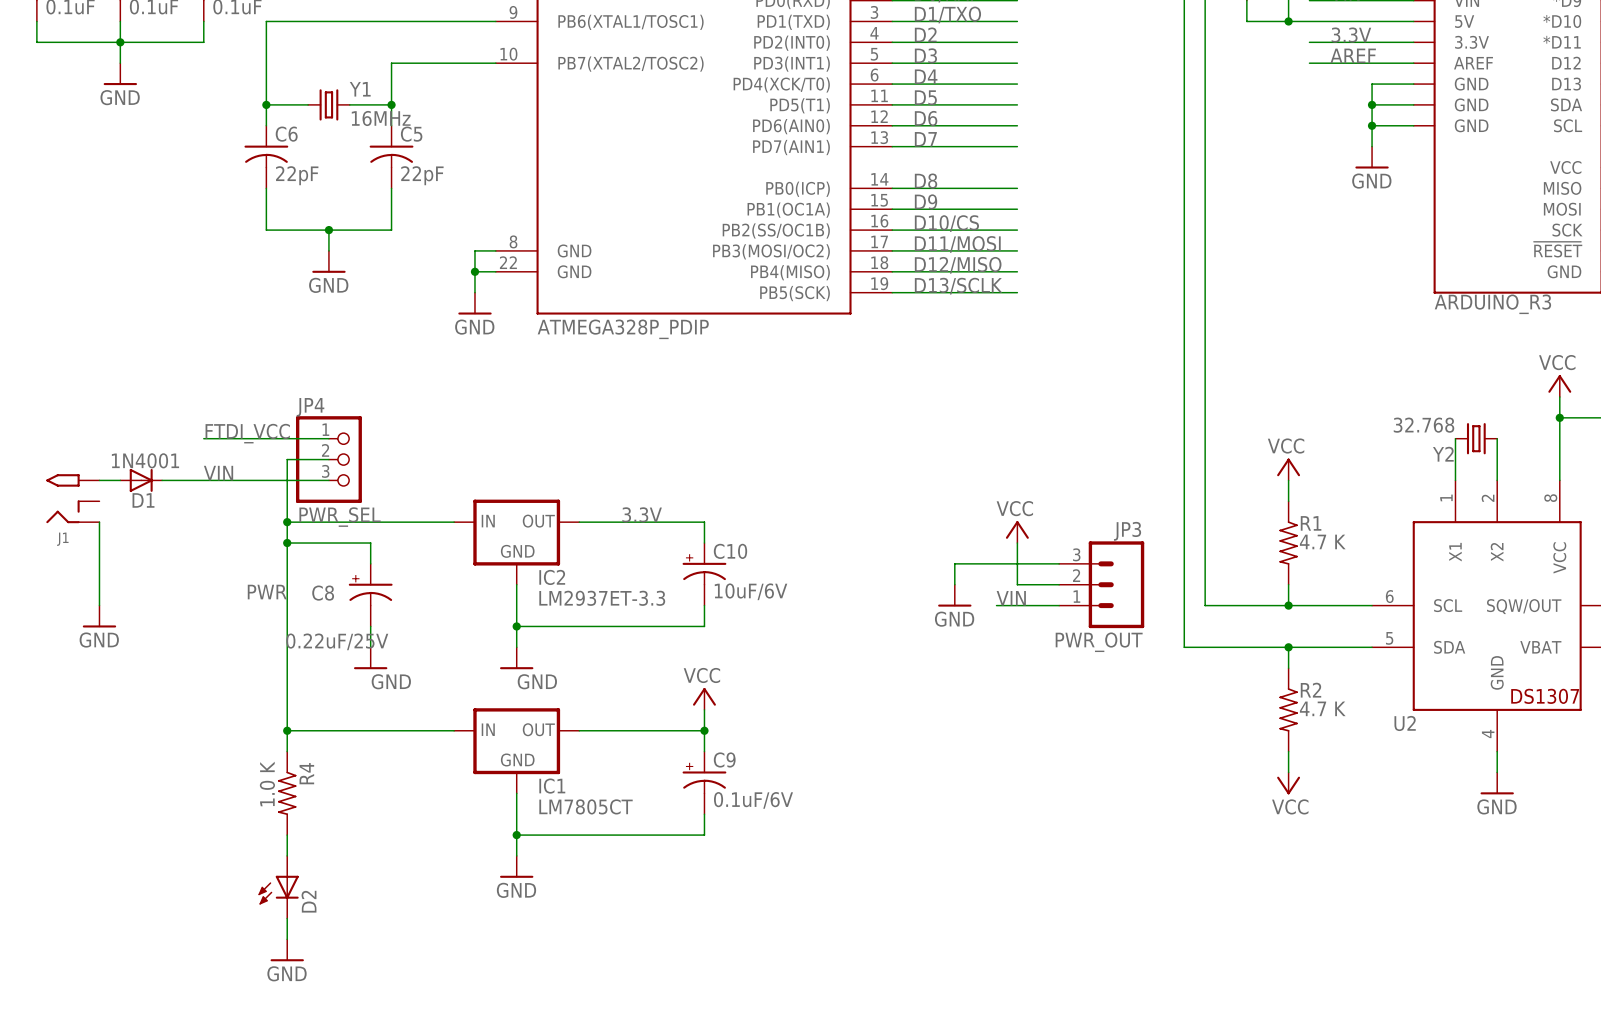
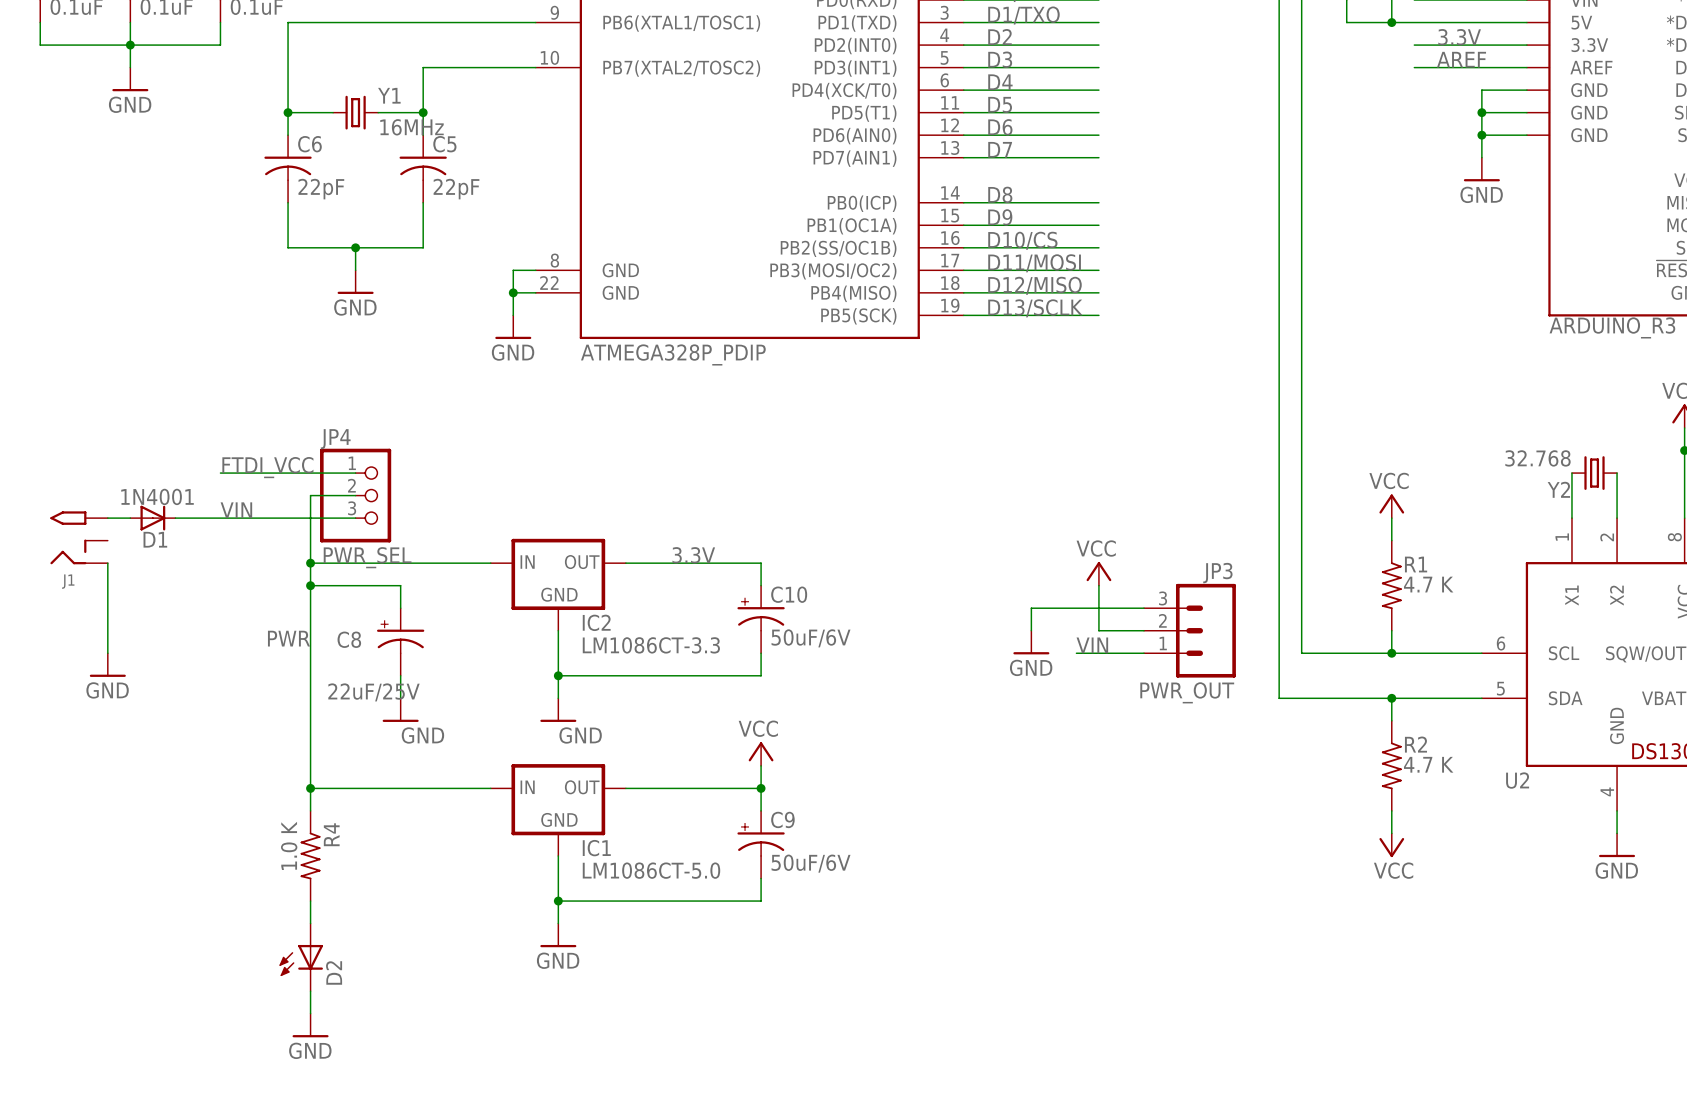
C10 value: 10uF/6V (751, 591) -> 50uF/6V (811, 638)
IC2 value: LM2937ET-3.3 (602, 598) -> LM1086CT-3.3 (651, 645)
C8 value: 0.22uF/25V (337, 641) -> 22uF/25V (373, 692)
C9 value: 0.1uF/6V (753, 800) -> 50uF/6V (811, 863)
IC1 value: LM7805CT (586, 806) -> LM1086CT-5.0 (651, 870)

